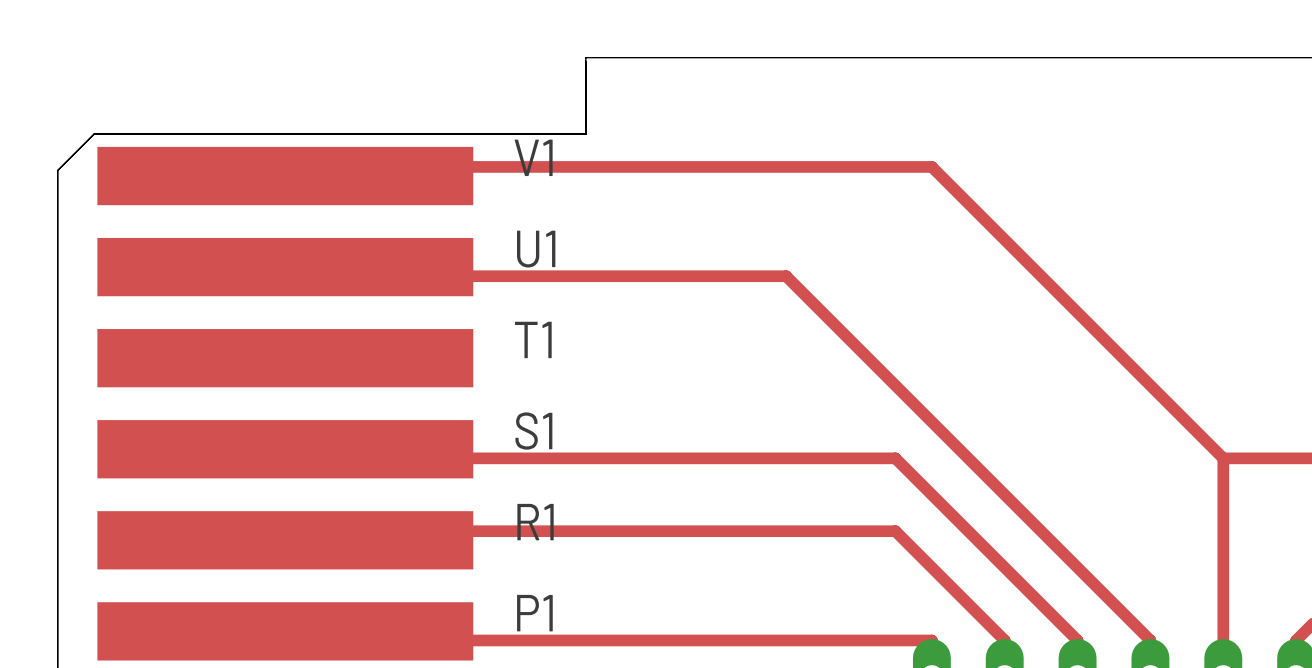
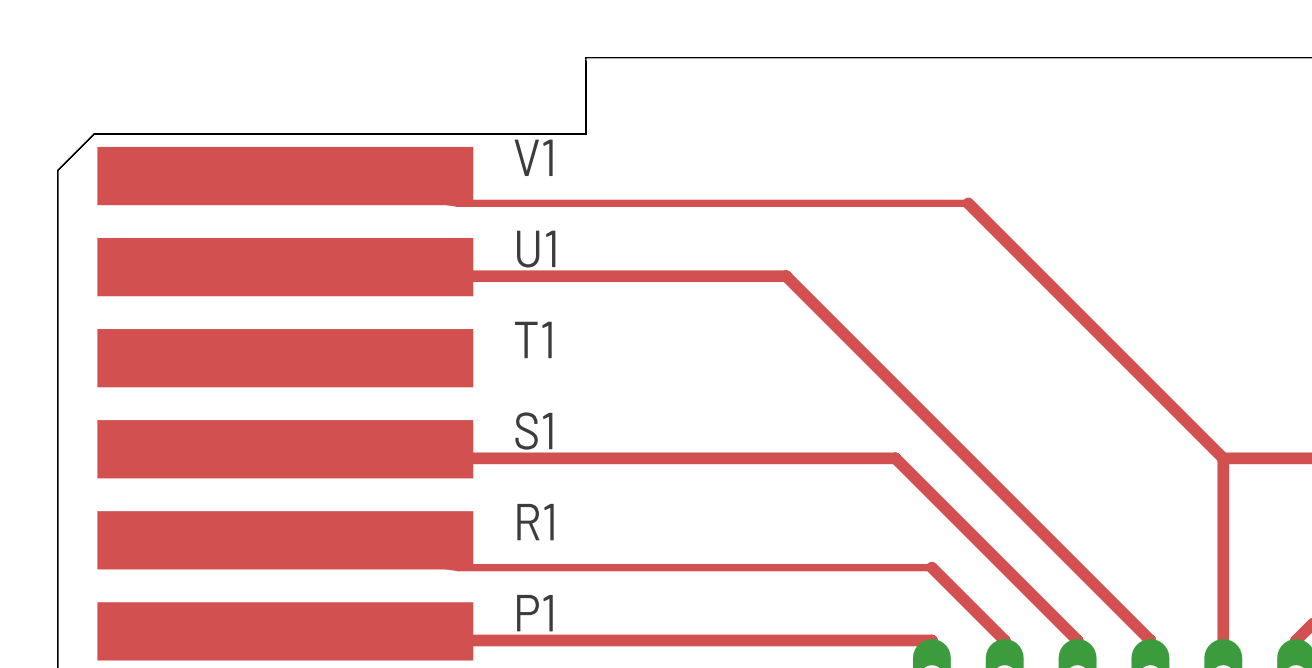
track: (285, 176) (421, 166) (931, 166) (968, 203) -> (285, 176) (458, 203) (968, 203)
track: (285, 540) (421, 531) (895, 531) (931, 567) -> (285, 540) (458, 567) (931, 567)

